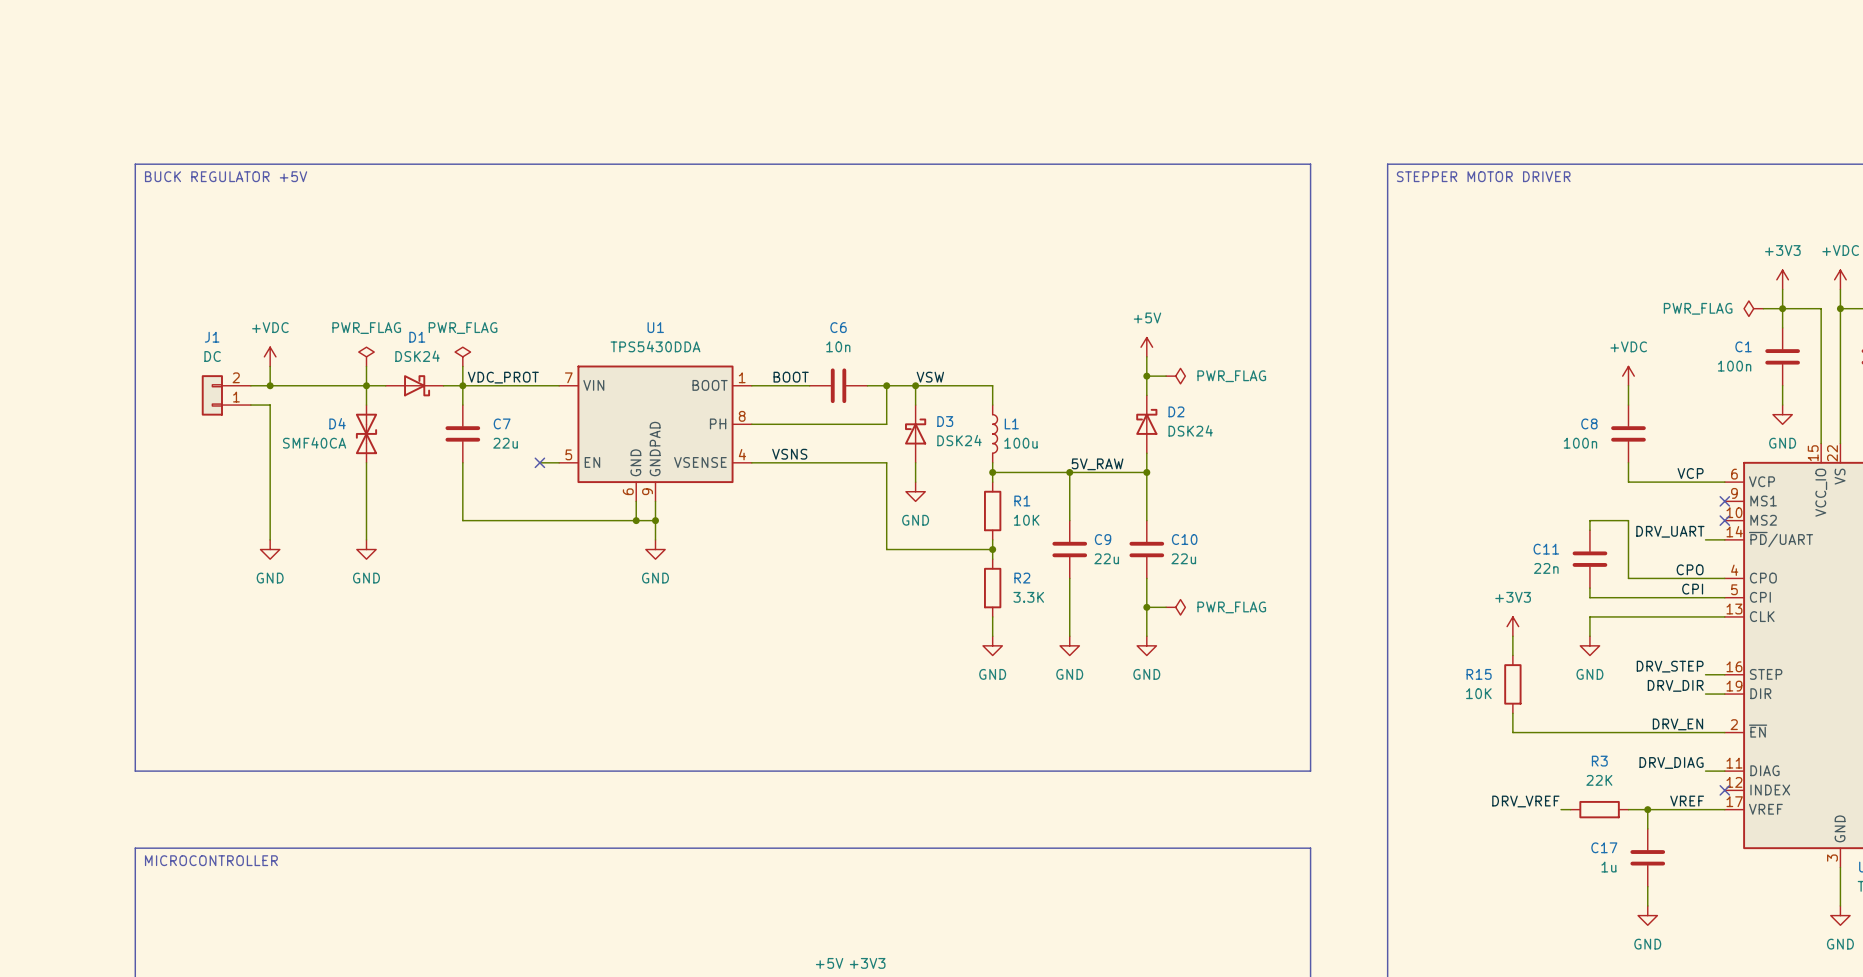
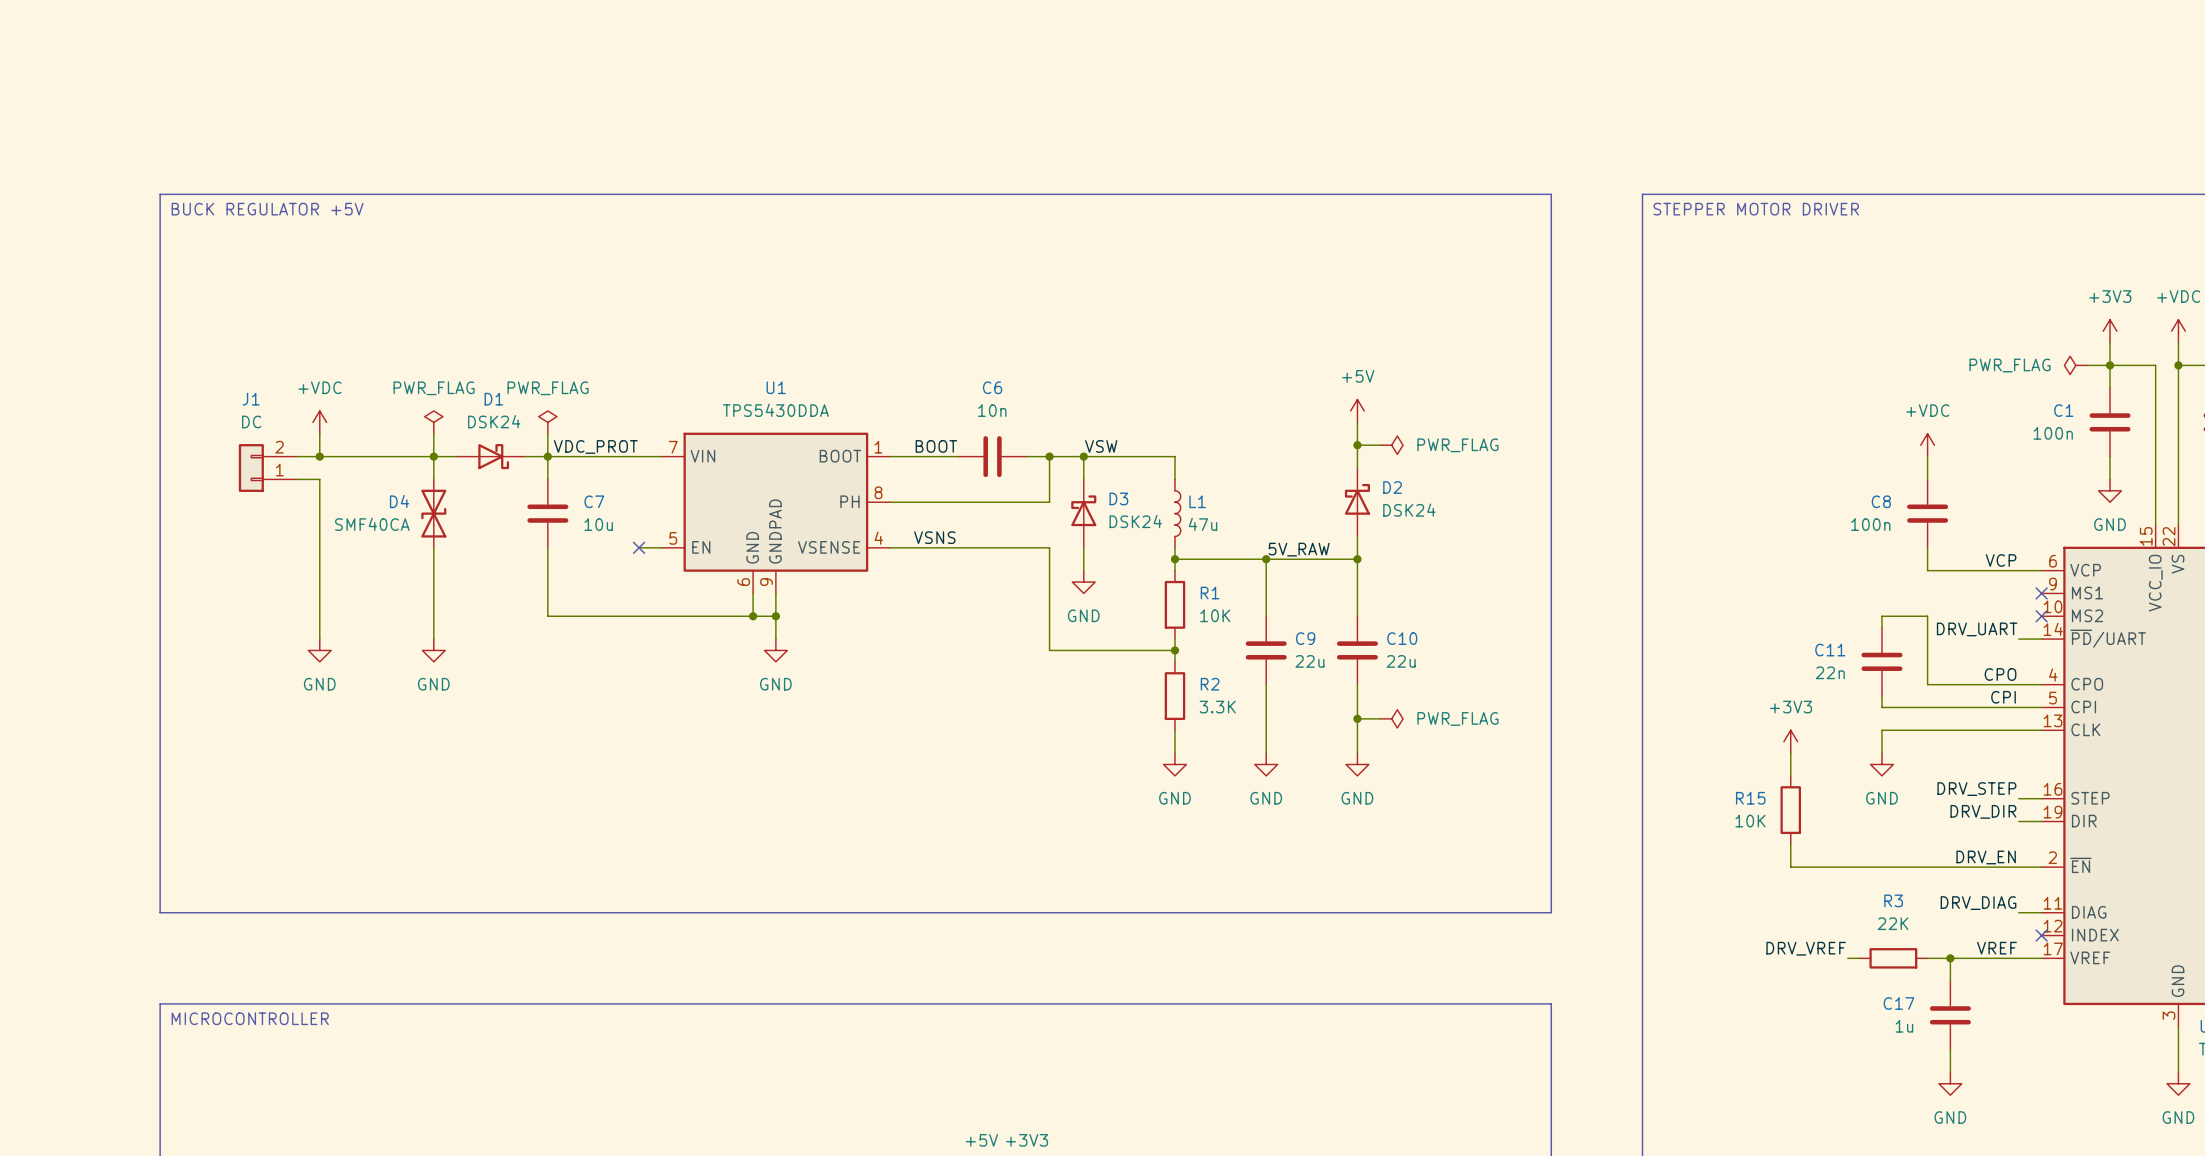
C7 value: 22u (505, 443) -> 10u (598, 524)
L1 value: 100u (1020, 443) -> 47u (1203, 524)

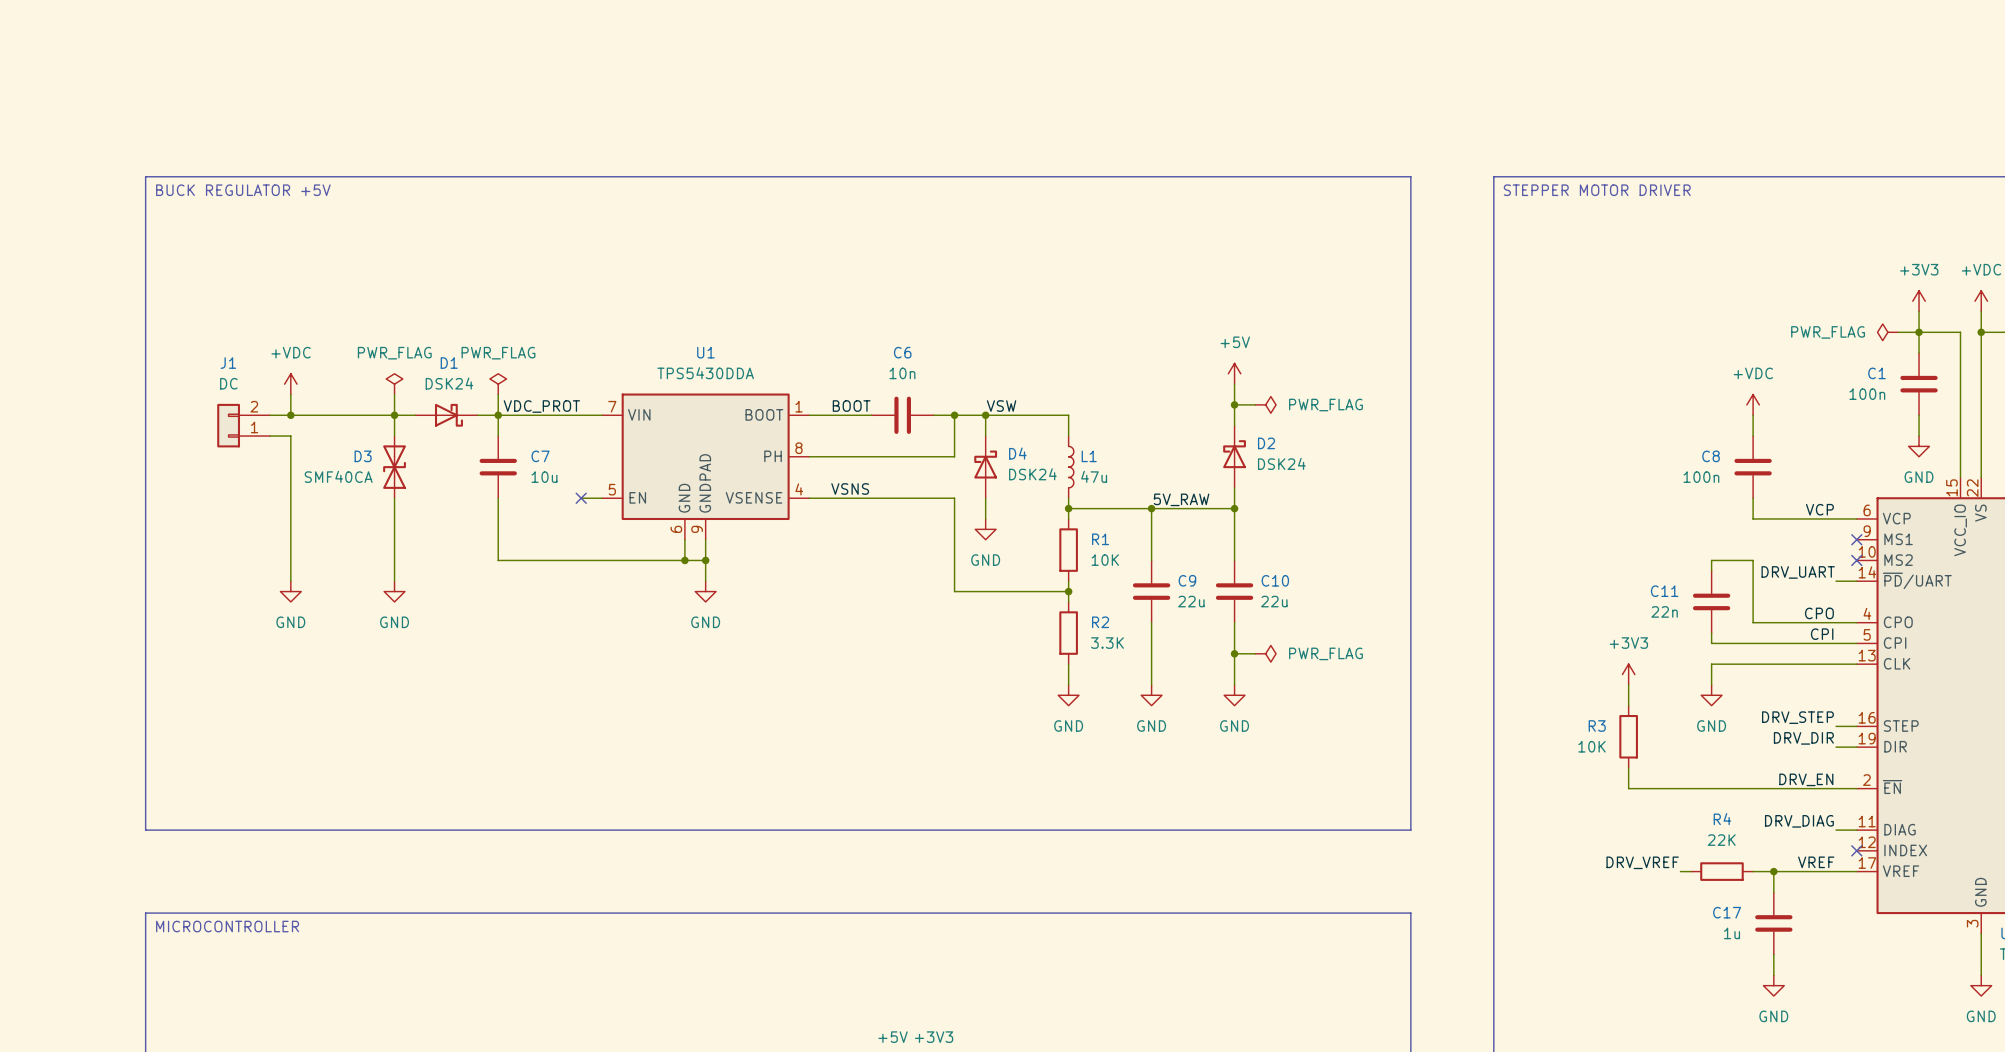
D3 name: D3 (1118, 498) -> D4 (1017, 453)
D4 name: D4 (399, 501) -> D3 (363, 456)
R15 name: R15 (1750, 798) -> R3 (1597, 726)
R3 name: R3 (1893, 900) -> R4 (1722, 819)

